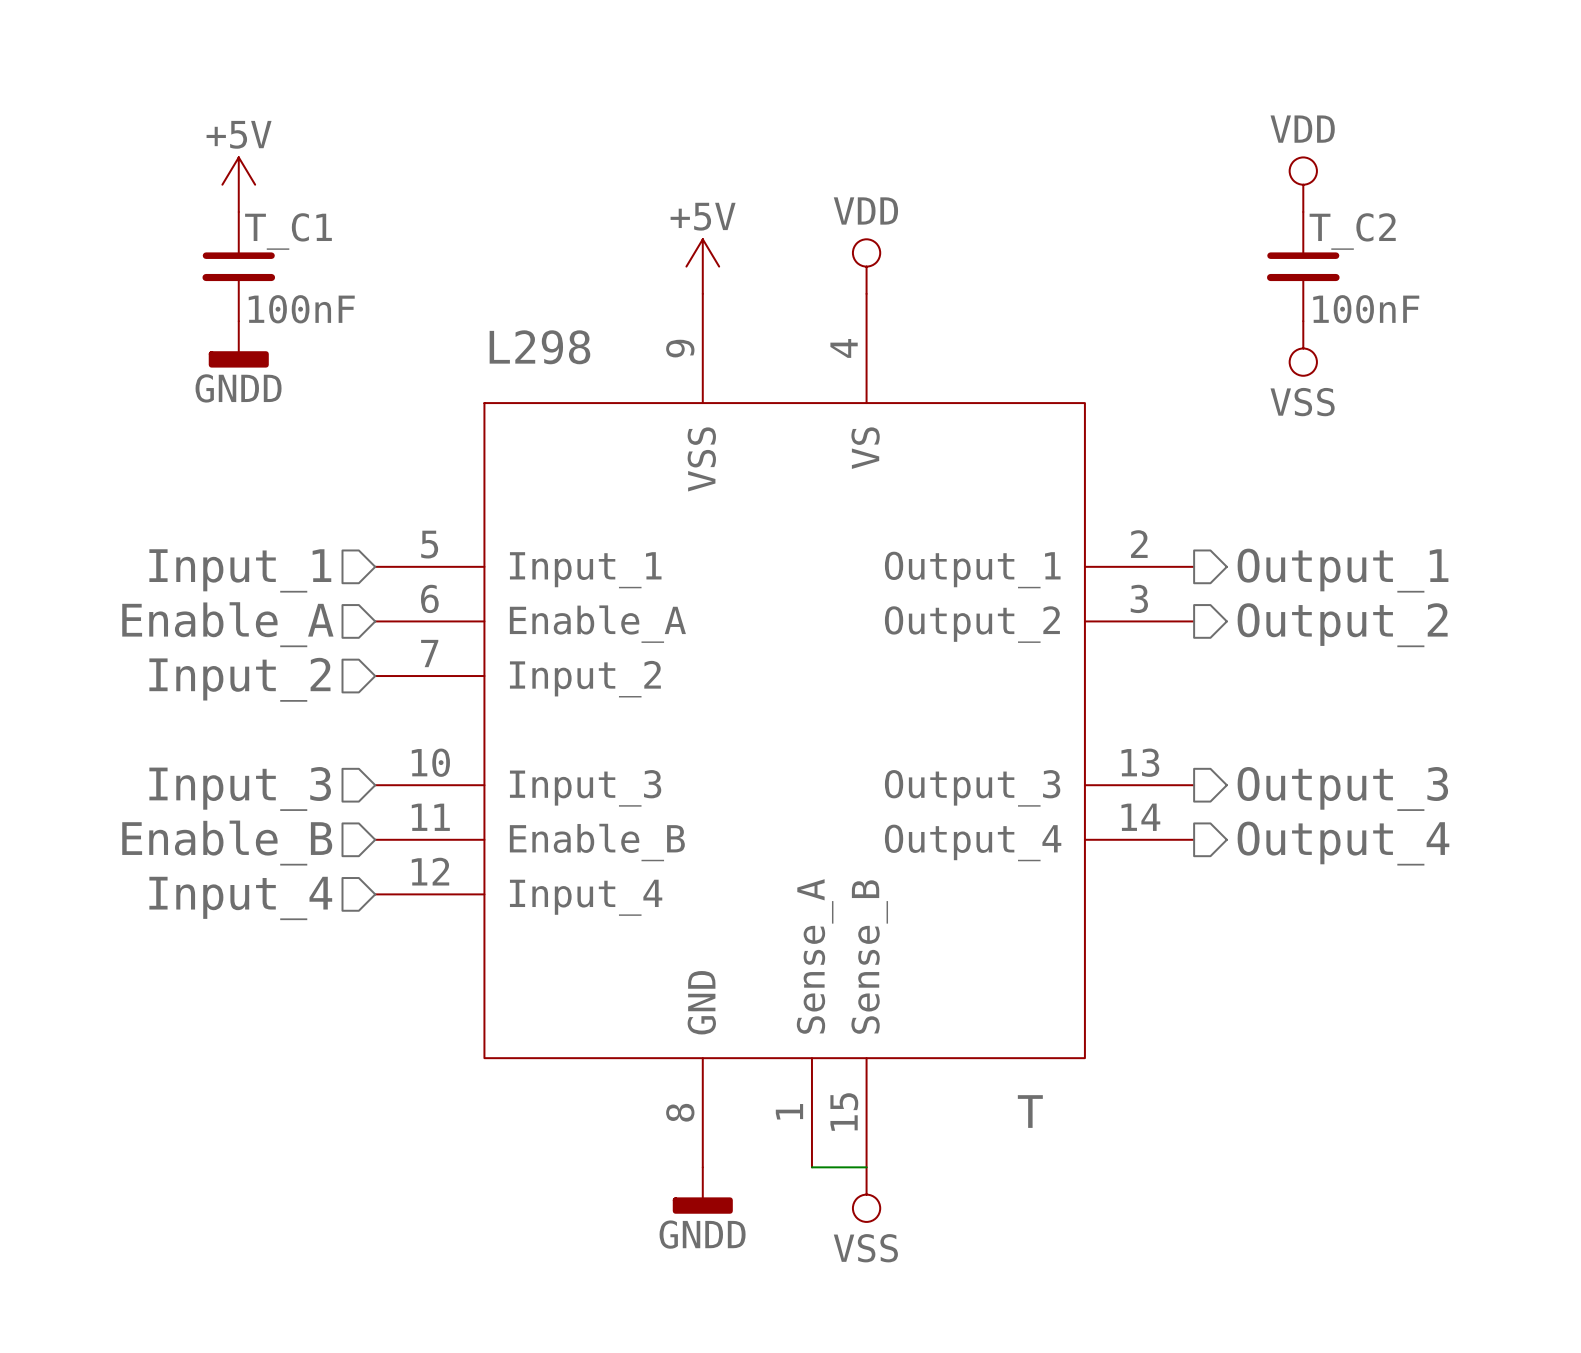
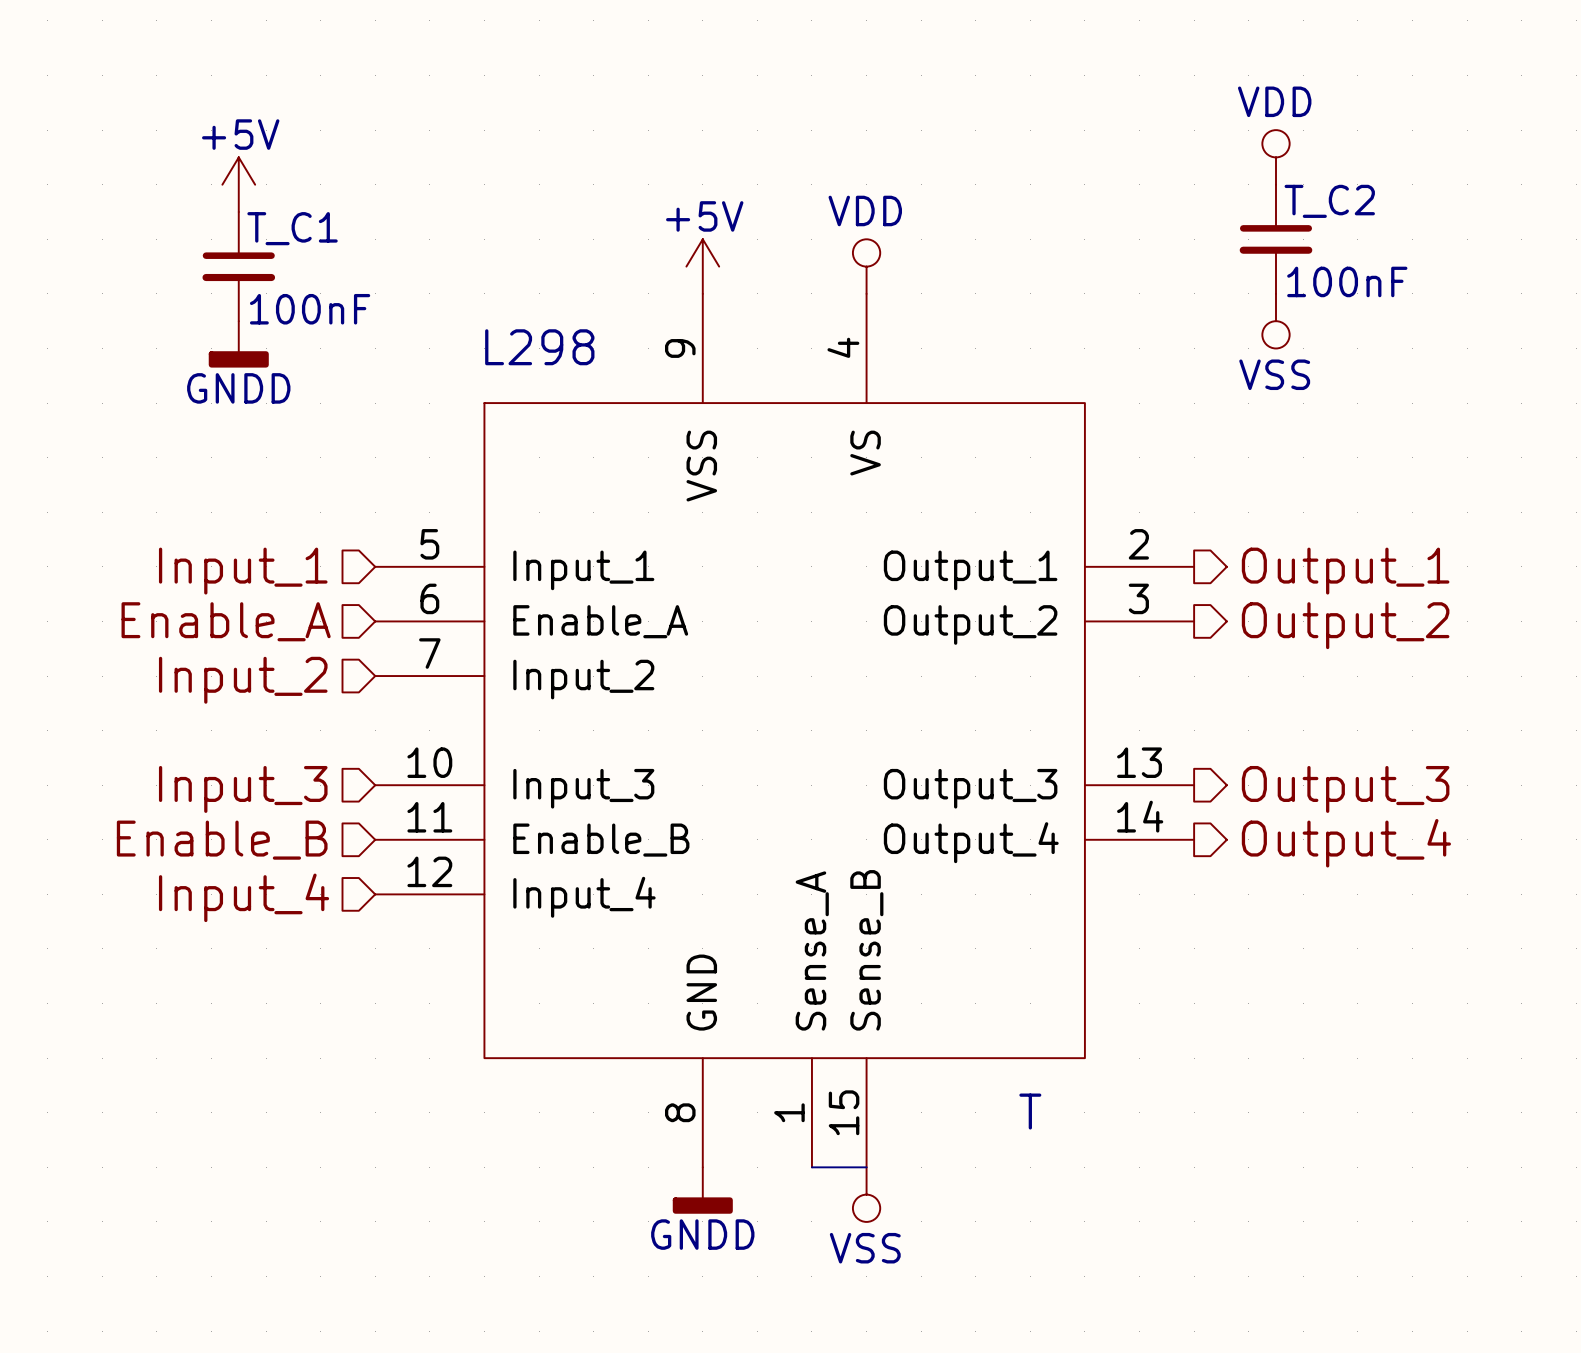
power symbol position: VDD (1303, 184) -> VDD (1276, 157)
T_C2 position: (1303, 266) -> (1276, 239)
power symbol position: VSS (1303, 348) -> VSS (1276, 321)

